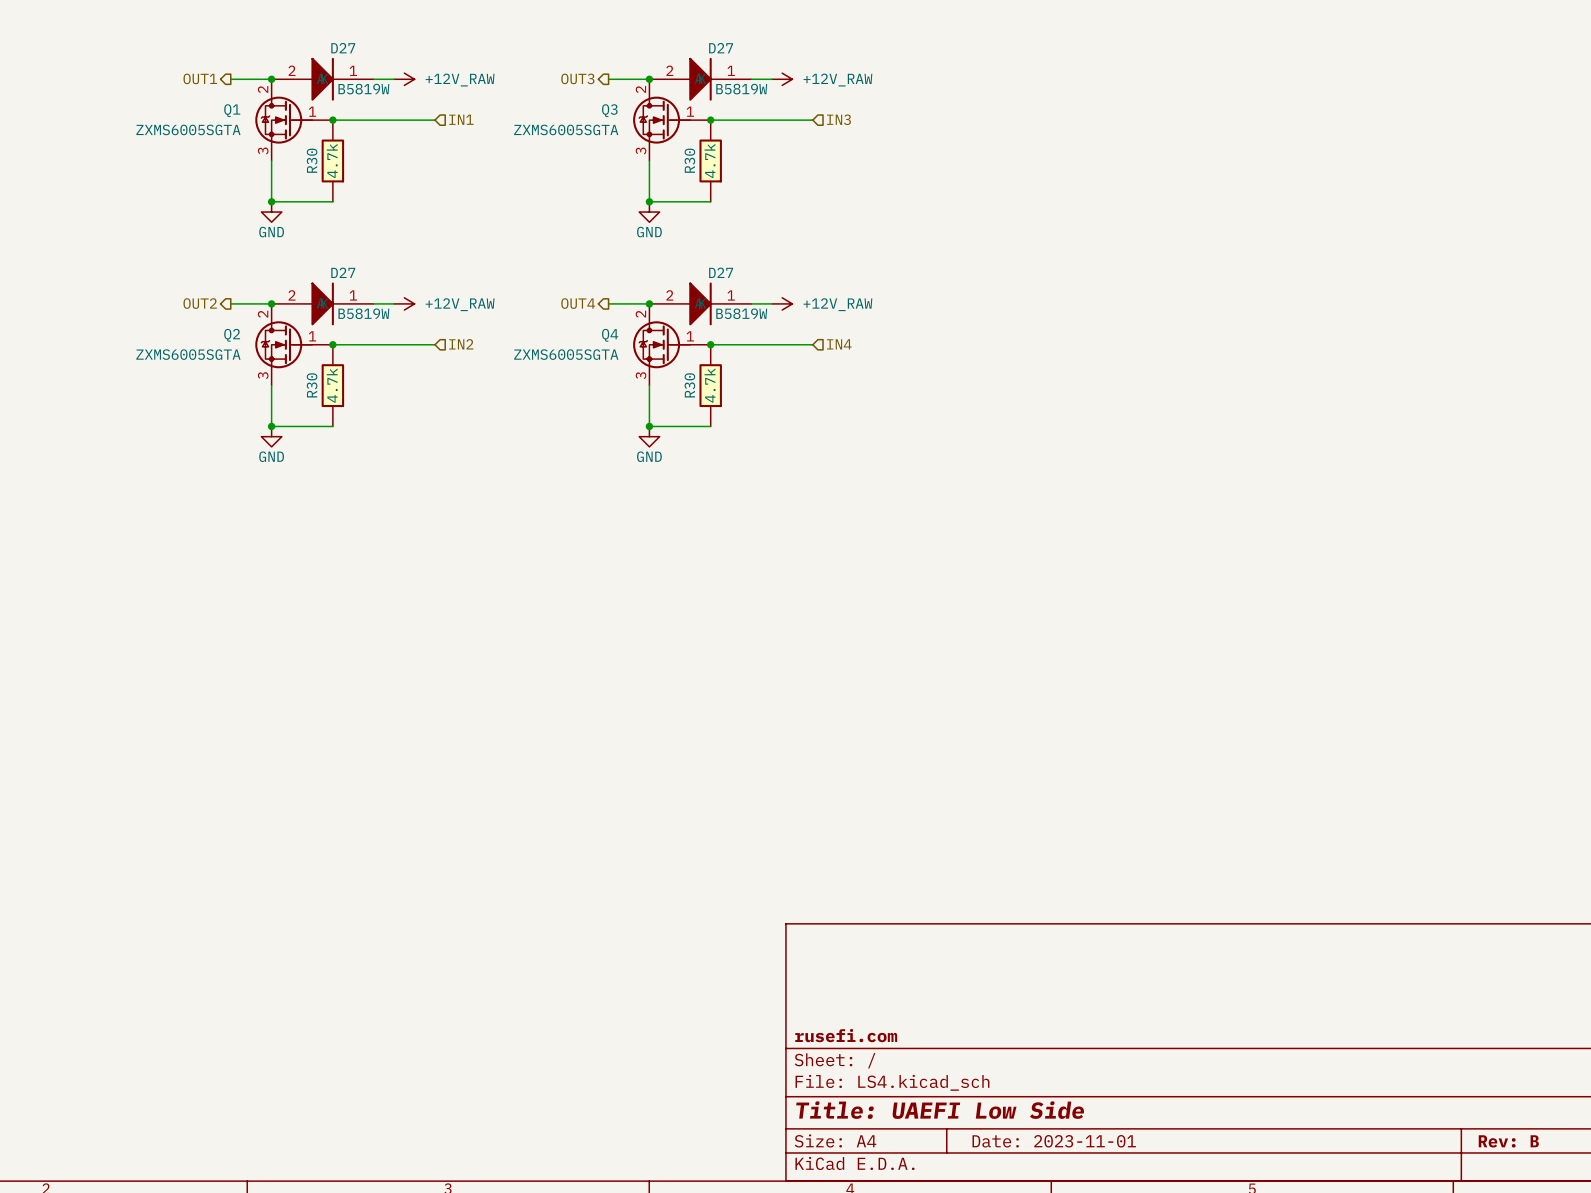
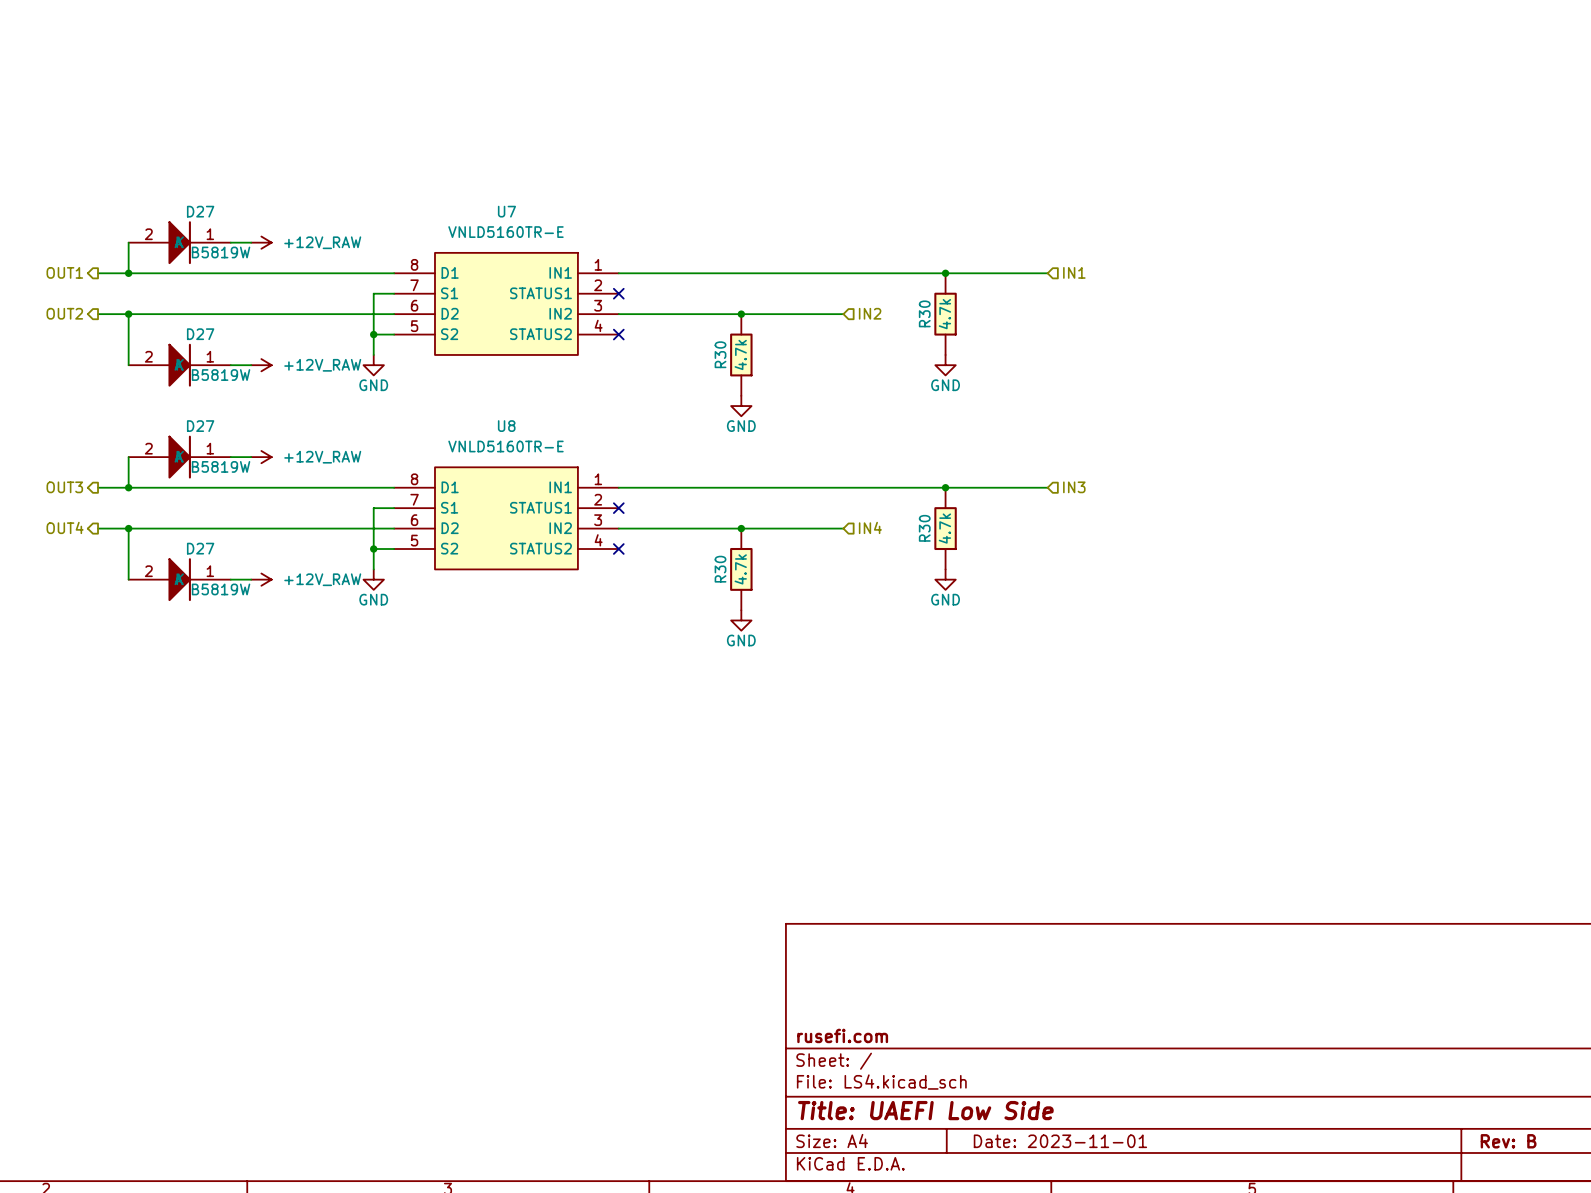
hierarchical label: OUT1 (200, 78) -> none
hierarchical label: OUT3 (577, 78) -> none
wire: (230, 79) (271, 79) -> none
junction: (271, 79) -> none
D27: B5819W (322, 79) -> none
wire: (373, 79) (394, 79) -> none
power symbol: +12V_RAW (404, 79) -> none
wire: (608, 79) (649, 79) -> none
junction: (649, 79) -> none
D27: B5819W (700, 79) -> none
wire: (751, 79) (771, 79) -> none
power symbol: +12V_RAW (782, 79) -> none
hierarchical label: IN1 (461, 119) -> none
hierarchical label: IN3 (838, 119) -> none
Q1: ZXMS6005SGTA (294, 120) -> none
wire: (332, 120) (434, 120) -> none
junction: (332, 120) -> none
Q3: ZXMS6005SGTA (671, 120) -> none
wire: (710, 120) (812, 120) -> none
junction: (710, 120) -> none
wire: (271, 160) (271, 201) (332, 201) -> none
R30: 4.7k (332, 160) -> none
wire: (649, 160) (649, 201) (710, 201) -> none
R30: 4.7k (710, 160) -> none
junction: (271, 201) -> none
junction: (649, 201) -> none
power symbol: GND (271, 212) -> none
power symbol: GND (649, 212) -> none
wire: none -> (128, 242) (128, 273)
D27: none -> B5819W (179, 242)
wire: none -> (230, 242) (251, 242)
power symbol: none -> +12V_RAW (261, 242)
hierarchical label: none -> OUT1 (64, 272)
hierarchical label: none -> IN1 (1074, 272)
wire: none -> (98, 273) (394, 273)
junction: none -> (128, 273)
wire: none -> (618, 273) (1047, 273)
junction: none -> (945, 273)
wire: none -> (394, 293) (373, 293) (373, 354)
no-connect mark: none -> (618, 293)
hierarchical label position: OUT2 (200, 303) -> OUT2 (64, 313)
wire: (230, 303) (271, 303) -> none
junction: (271, 303) -> none
D27: B5819W (322, 303) -> none
wire: (373, 303) (394, 303) -> (373, 334) (394, 334)
power symbol: +12V_RAW (404, 303) -> none
U7: none -> VNLD5160TR-E (506, 303)
hierarchical label: OUT4 (578, 303) -> none
wire: (608, 303) (649, 303) -> none
junction: (649, 303) -> none
D27: B5819W (700, 303) -> none
wire: (751, 303) (771, 303) -> none
power symbol: +12V_RAW (782, 303) -> none
hierarchical label: none -> IN2 (870, 313)
wire: none -> (98, 314) (394, 314)
wire: none -> (128, 314) (128, 365)
junction: none -> (128, 314)
wire: none -> (618, 314) (843, 314)
R30: none -> 4.7k (945, 314)
no-connect mark: none -> (618, 334)
Q2: ZXMS6005SGTA (294, 344) -> none
wire: (332, 344) (434, 344) -> none
junction position: (332, 344) -> (373, 334)
hierarchical label: IN2 (461, 344) -> none
Q4: ZXMS6005SGTA (671, 344) -> none
wire: (710, 344) (812, 344) -> none
junction position: (710, 344) -> (741, 314)
hierarchical label position: IN4 (839, 344) -> IN4 (870, 527)
D27: none -> B5819W (179, 365)
wire: none -> (230, 365) (251, 365)
power symbol: none -> +12V_RAW (261, 365)
power symbol: none -> GND (373, 365)
power symbol: none -> GND (945, 365)
wire: (271, 385) (271, 426) (332, 426) -> none
R30: 4.7k (332, 385) -> none
wire: (649, 385) (649, 426) (710, 426) -> none
R30 position: (710, 385) -> (741, 354)
junction: (271, 426) -> none
junction: (649, 426) -> none
power symbol: GND (271, 436) -> none
power symbol position: GND (649, 436) -> GND (741, 406)
wire: none -> (128, 457) (128, 487)
D27: none -> B5819W (179, 457)
wire: none -> (230, 457) (251, 457)
power symbol: none -> +12V_RAW (261, 457)
hierarchical label: none -> OUT3 (64, 487)
wire: none -> (98, 487) (394, 487)
junction: none -> (128, 487)
wire: none -> (618, 487) (1047, 487)
junction: none -> (945, 487)
hierarchical label: none -> IN3 (1074, 487)
wire: none -> (394, 508) (373, 508) (373, 569)
no-connect mark: none -> (618, 508)
U8: none -> VNLD5160TR-E (506, 518)
hierarchical label: none -> OUT4 (65, 527)
wire: none -> (98, 528) (394, 528)
wire: none -> (128, 528) (128, 579)
junction: none -> (128, 528)
wire: none -> (618, 528) (843, 528)
junction: none -> (741, 528)
R30: none -> 4.7k (945, 528)
wire: none -> (373, 549) (394, 549)
junction: none -> (373, 549)
no-connect mark: none -> (618, 549)
R30: none -> 4.7k (741, 569)
D27: none -> B5819W (179, 579)
wire: none -> (230, 579) (251, 579)
power symbol: none -> +12V_RAW (261, 579)
power symbol: none -> GND (373, 579)
power symbol: none -> GND (945, 579)
power symbol: none -> GND (741, 620)

